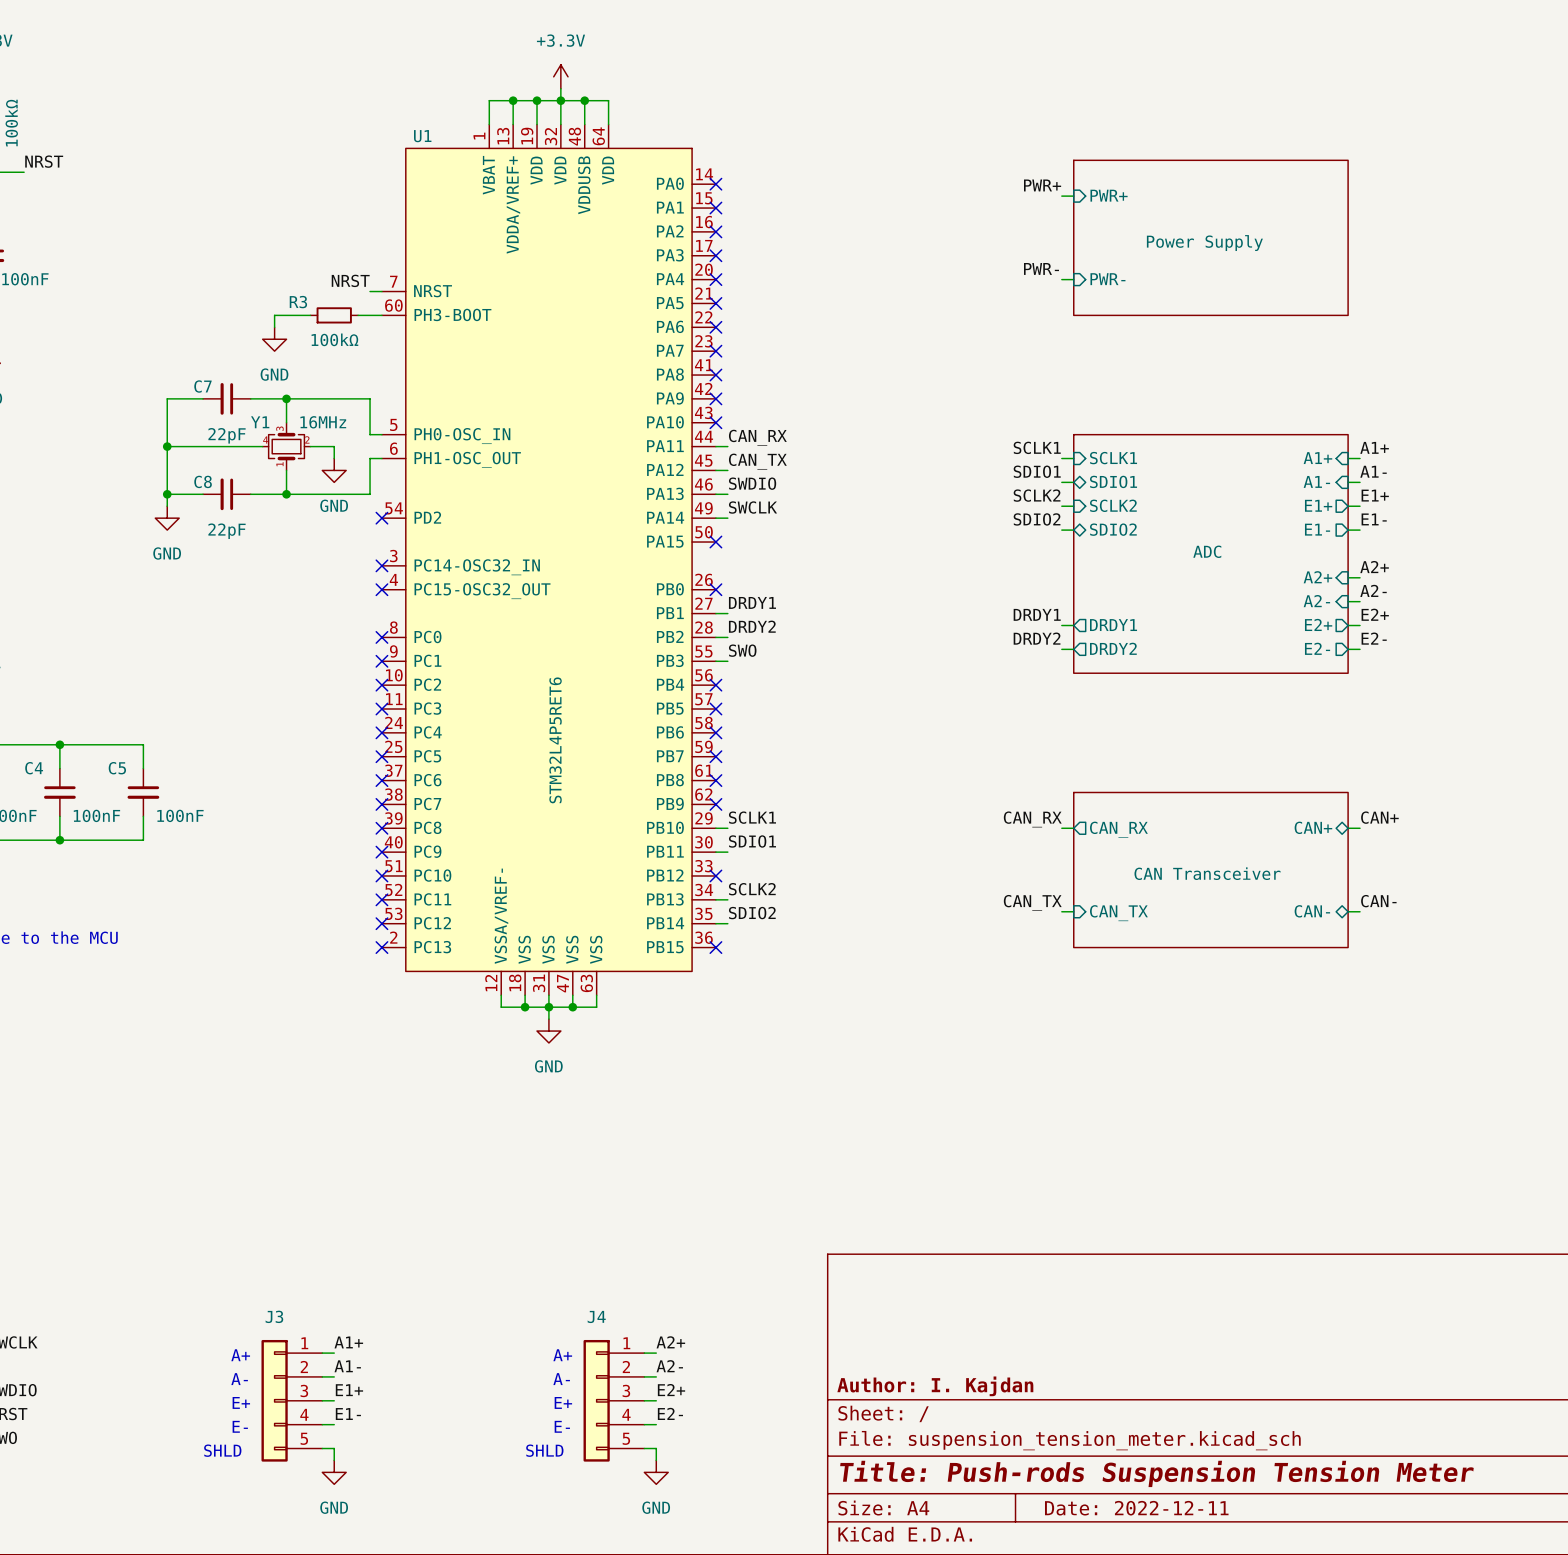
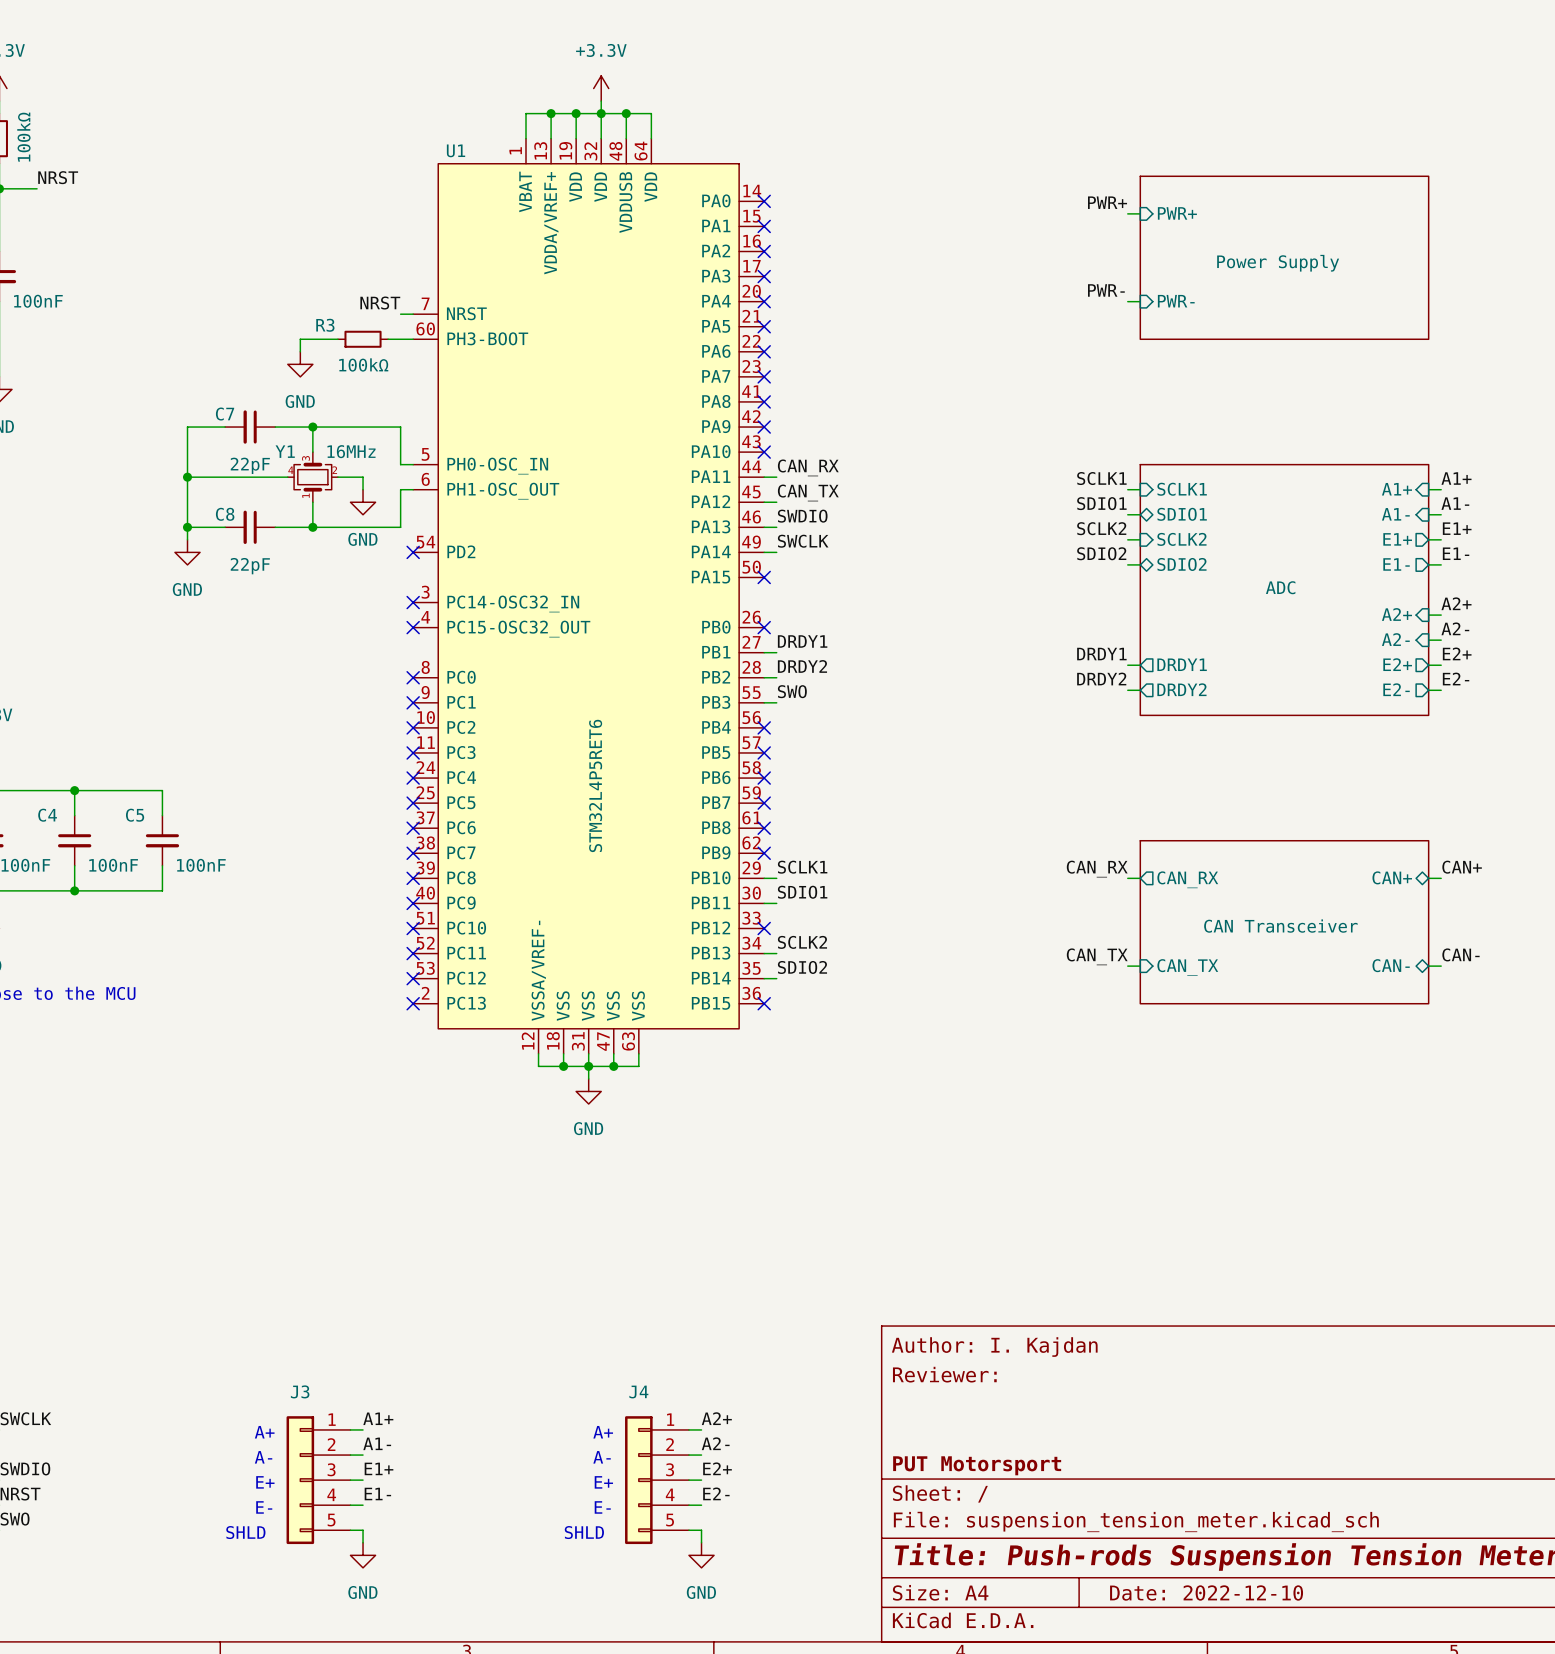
title block: none -> Author: I. Kajdan (994, 1347)
title block: none -> Reviewer: (944, 1374)
title block: Author: I. Kajdan (935, 1386) -> PUT Motorsport (977, 1465)
title block: Date: 2022-12-11 (1136, 1508) -> Date: 2022-12-10 (1206, 1593)

